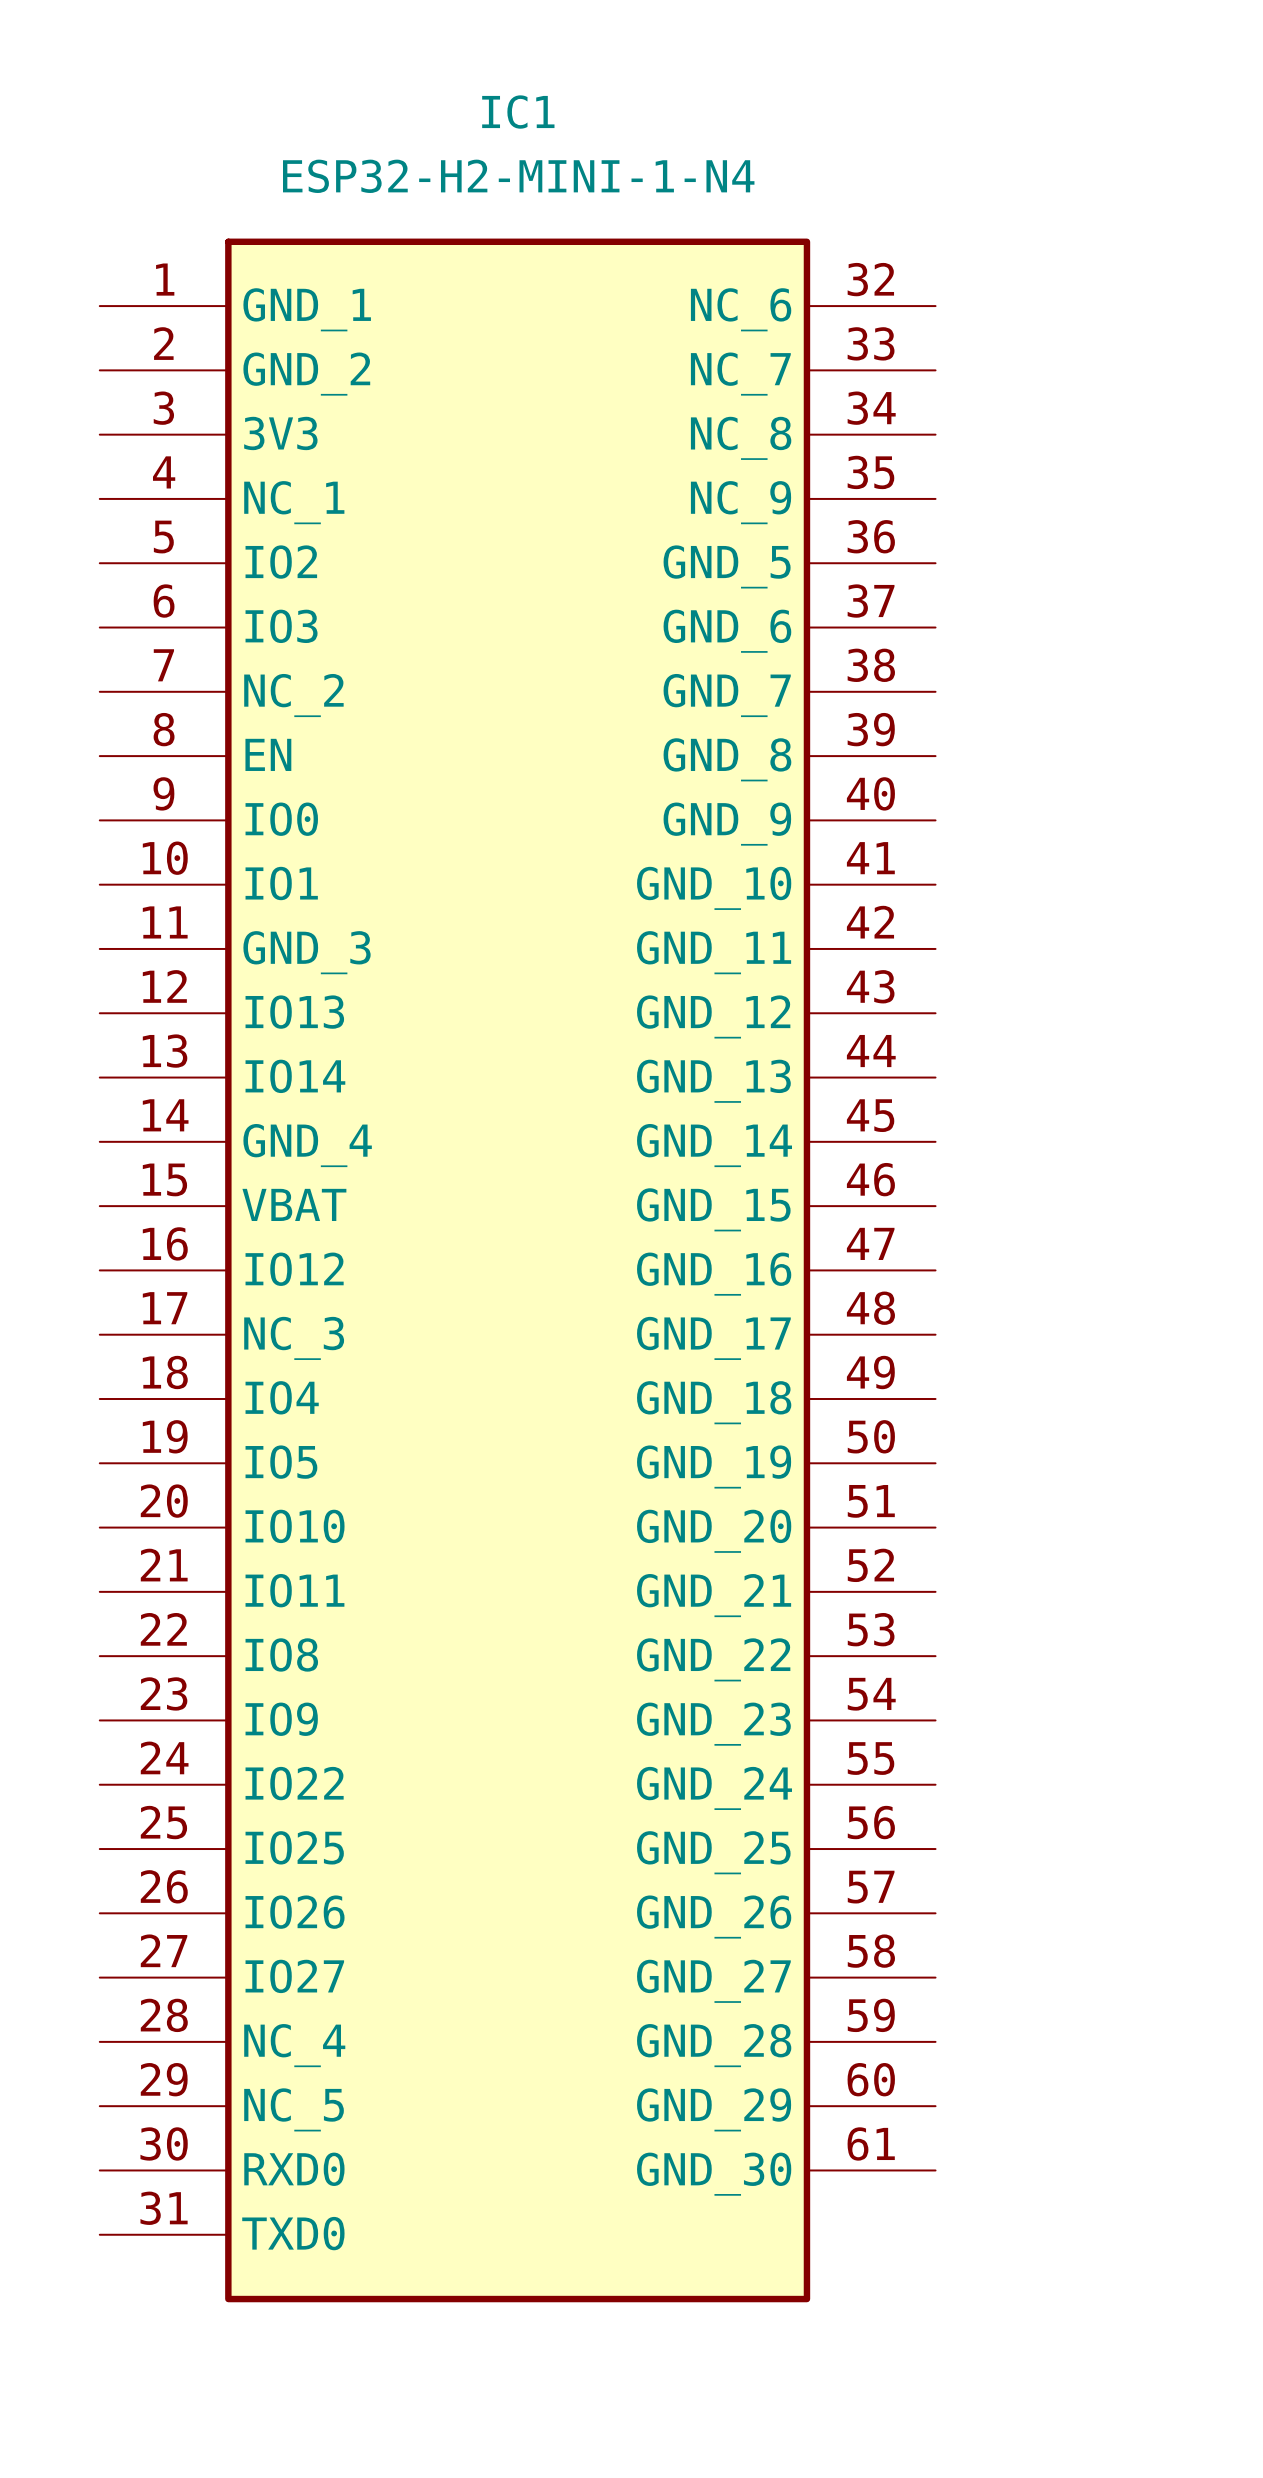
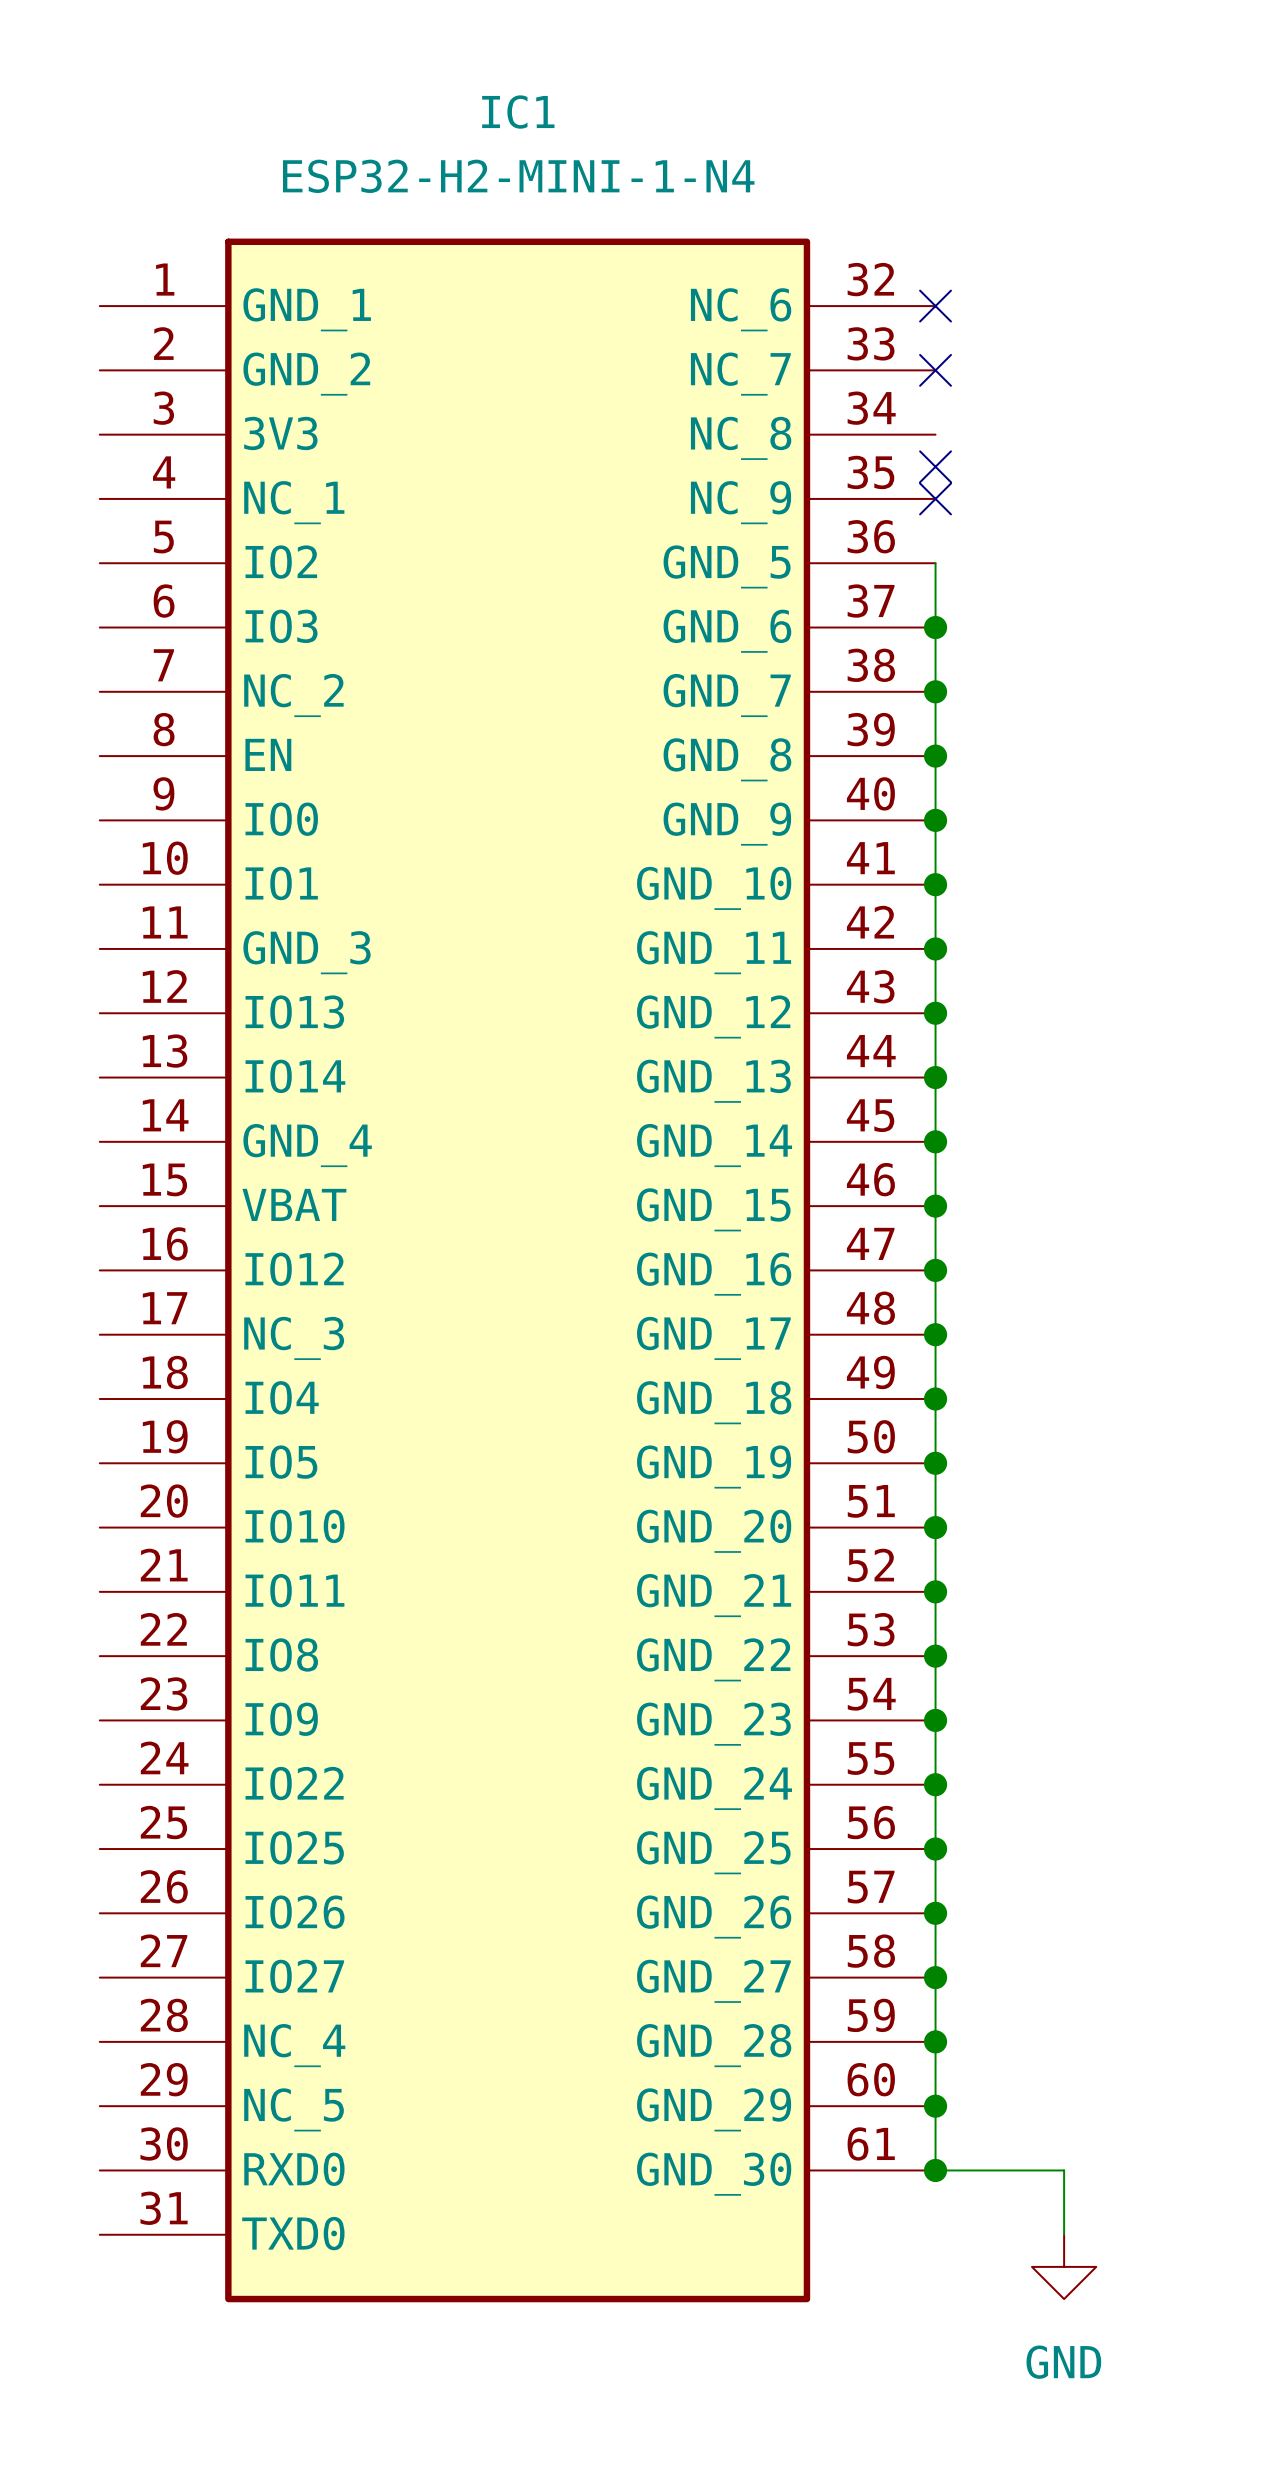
no-connect mark: none -> (935, 306)
no-connect mark: none -> (935, 370)
no-connect mark: none -> (935, 466)
no-connect mark: none -> (935, 498)
wire: none -> (935, 563) (935, 2170) (1064, 2170) (1064, 2234)
junction: none -> (935, 627)
junction: none -> (935, 691)
junction: none -> (935, 756)
junction: none -> (935, 820)
junction: none -> (935, 884)
junction: none -> (935, 948)
junction: none -> (935, 1013)
junction: none -> (935, 1077)
junction: none -> (935, 1141)
junction: none -> (935, 1206)
junction: none -> (935, 1270)
junction: none -> (935, 1334)
junction: none -> (935, 1398)
junction: none -> (935, 1463)
junction: none -> (935, 1527)
junction: none -> (935, 1591)
junction: none -> (935, 1656)
junction: none -> (935, 1720)
junction: none -> (935, 1784)
junction: none -> (935, 1849)
junction: none -> (935, 1913)
junction: none -> (935, 1977)
junction: none -> (935, 2041)
junction: none -> (935, 2106)
junction: none -> (935, 2170)
power symbol: none -> GND (1064, 2266)

